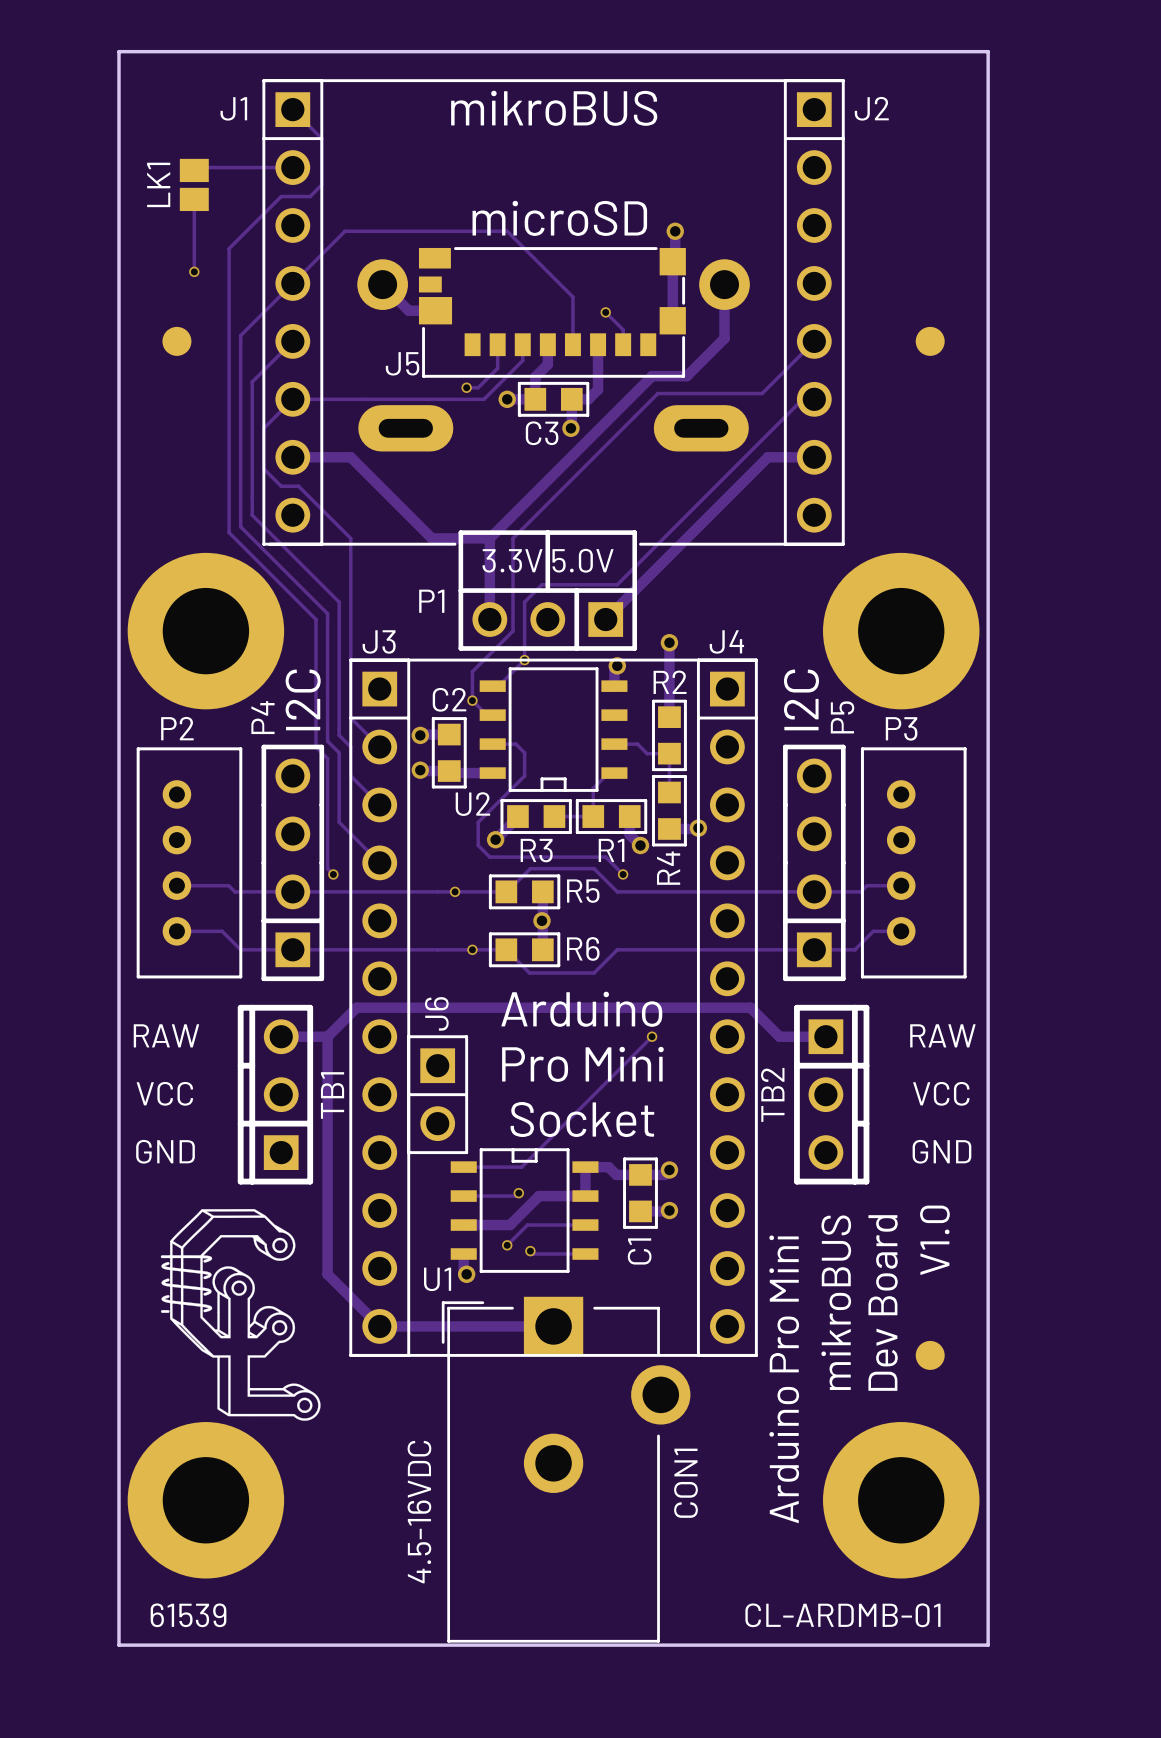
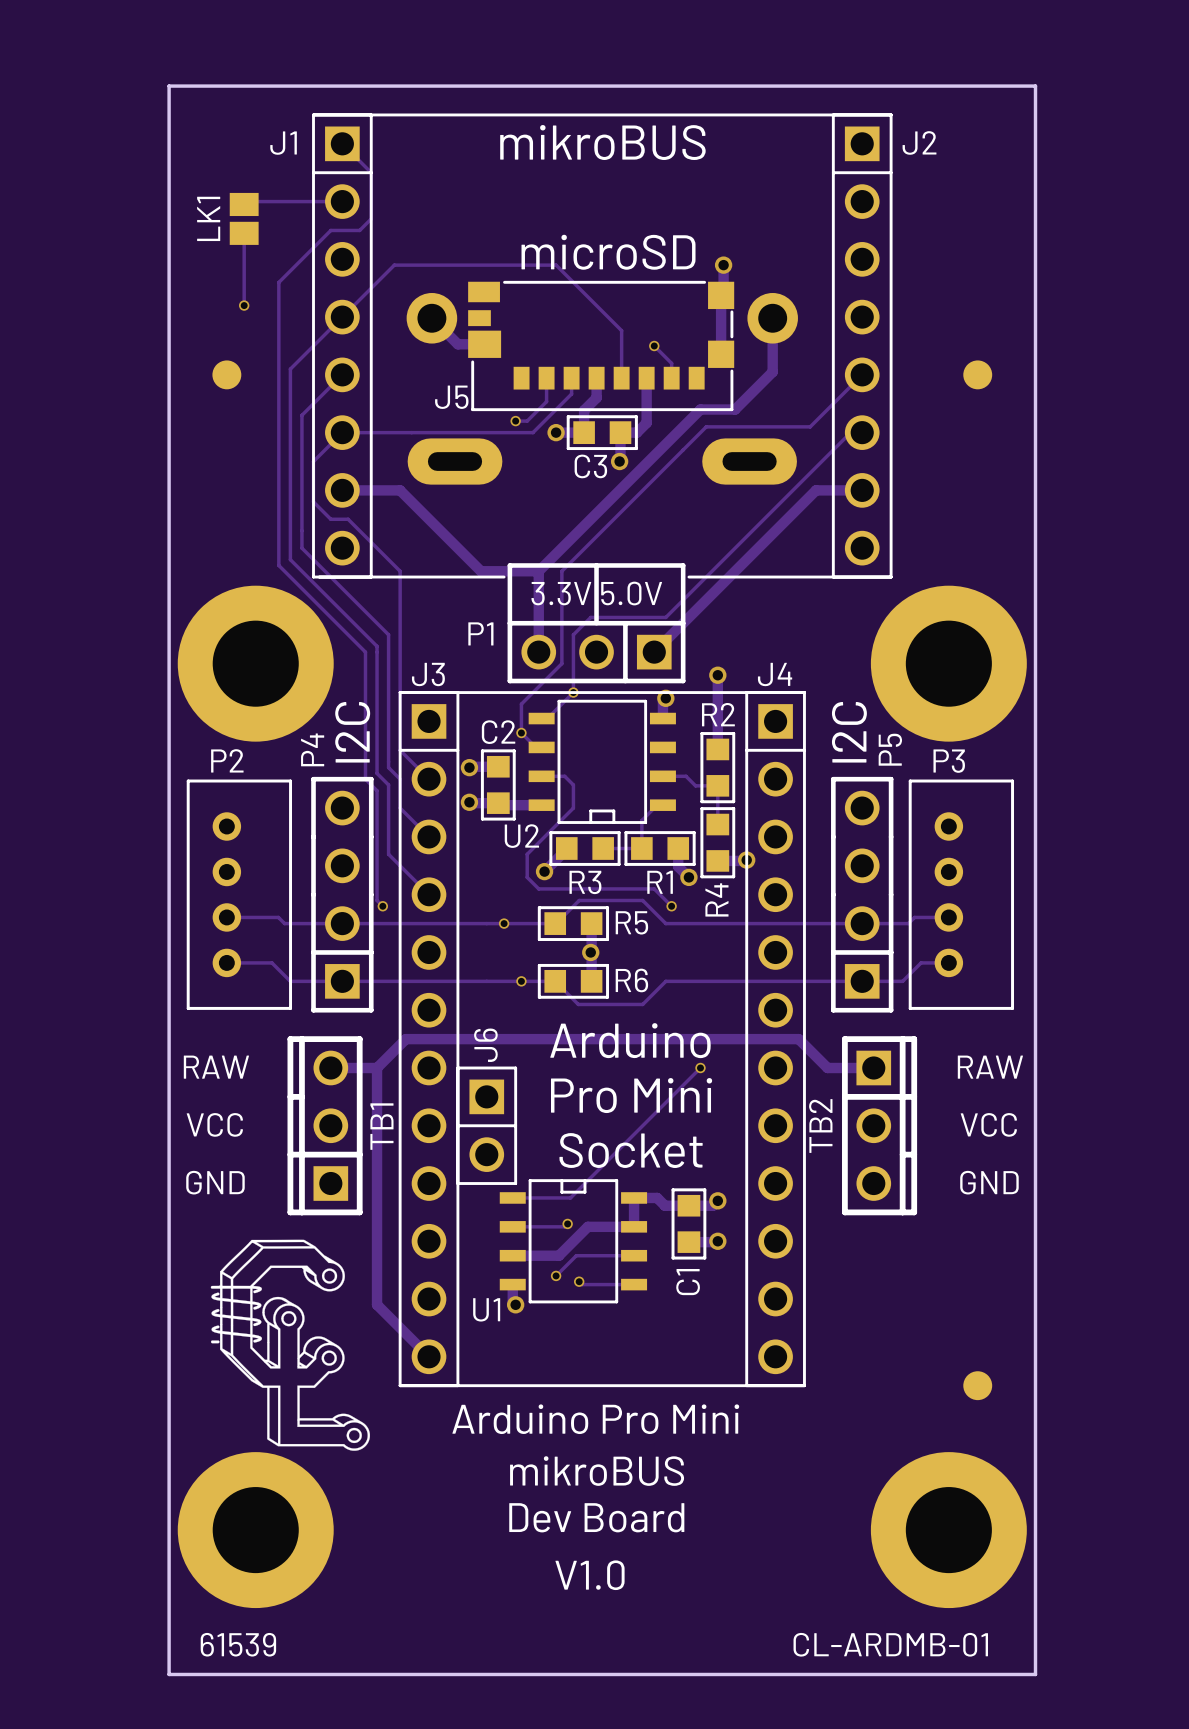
text rotation: 0° (934, 1240) -> 90° clockwise (590, 1575)
text position: V1.0 (934, 1240) -> V1.0 (590, 1575)
text rotation: 0° (836, 1302) -> 90° clockwise (597, 1471)
text position: mikroBUS (836, 1302) -> mikroBUS (597, 1471)
text rotation: 0° (883, 1302) -> 90° clockwise (596, 1517)
text position: Dev Board (883, 1302) -> Dev Board (596, 1517)
track: (379, 1326) (553, 1326) -> none
text rotation: 0° (784, 1379) -> 90° clockwise (595, 1419)
CON1: (566, 1469) -> none
text: 4.5-16VDC (419, 1512) -> none

